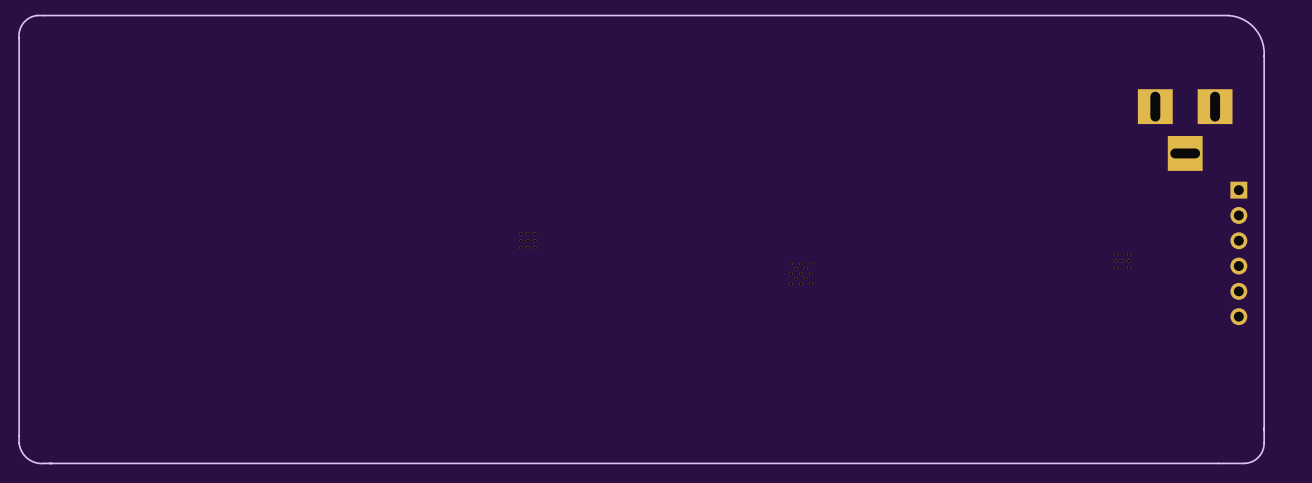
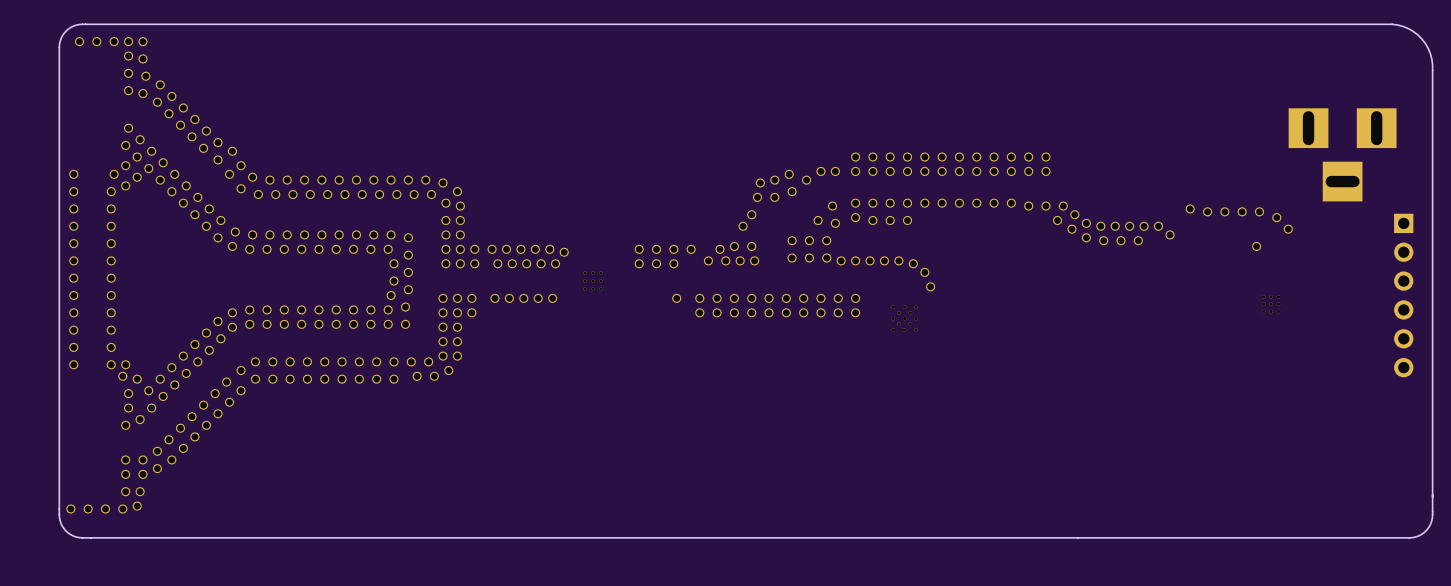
board edge: (79, 15) (34, 16) (25, 21) (19, 32) (19, 443) (23, 454) (35, 462) (1243, 463) (1251, 461) (1258, 457) (1262, 450) (1264, 443) -> (82, 24) (73, 26) (66, 31) (61, 38) (59, 47) (59, 514) (64, 528) (73, 536) (82, 537) (1409, 537) (1418, 536) (1425, 531) (1430, 523) (1432, 511)
part: none -> (79, 41)
part: none -> (96, 41)
part: none -> (114, 41)
part: none -> (128, 41)
part: none -> (142, 41)
part: none -> (128, 56)
part: none -> (142, 58)
part: none -> (128, 73)
part: none -> (145, 76)
part: none -> (160, 84)
part: none -> (128, 90)
part: none -> (142, 93)
part: none -> (171, 96)
part: none -> (157, 102)
part: none -> (183, 107)
part: none -> (168, 113)
part: none -> (194, 119)
part: none -> (180, 125)
part: none -> (128, 128)
part: none -> (206, 131)
part: none -> (192, 136)
part: none -> (140, 139)
part: none -> (218, 142)
part: none -> (125, 145)
part: none -> (203, 148)
part: none -> (151, 151)
part: none -> (232, 151)
part: none -> (137, 157)
part: none -> (855, 157)
part: none -> (872, 157)
part: none -> (890, 157)
part: none -> (907, 157)
part: none -> (924, 157)
part: none -> (942, 157)
part: none -> (959, 157)
part: none -> (976, 157)
part: none -> (994, 157)
part: none -> (1011, 157)
part: none -> (1028, 157)
part: none -> (1046, 157)
part: none -> (218, 159)
part: none -> (163, 162)
part: none -> (125, 165)
part: none -> (241, 165)
part: none -> (148, 168)
part: none -> (820, 171)
part: none -> (835, 171)
part: none -> (855, 171)
part: none -> (872, 171)
part: none -> (890, 171)
part: none -> (907, 171)
part: none -> (924, 171)
part: none -> (942, 171)
part: none -> (959, 171)
part: none -> (976, 171)
part: none -> (994, 171)
part: none -> (1011, 171)
part: none -> (1028, 171)
part: none -> (1046, 171)
part: none -> (73, 174)
part: none -> (114, 174)
part: none -> (174, 174)
part: none -> (229, 174)
part: none -> (789, 174)
part: none -> (137, 177)
part: none -> (252, 177)
part: none -> (160, 180)
part: none -> (269, 180)
part: none -> (287, 180)
part: none -> (304, 180)
part: none -> (321, 180)
part: none -> (339, 180)
part: none -> (356, 180)
part: none -> (373, 180)
part: none -> (391, 180)
part: none -> (408, 180)
part: none -> (425, 180)
part: none -> (774, 180)
part: none -> (806, 180)
part: none -> (443, 182)
part: none -> (760, 182)
part: none -> (125, 185)
part: none -> (186, 185)
part: none -> (241, 188)
part: none -> (73, 191)
part: none -> (111, 191)
part: none -> (171, 191)
part: none -> (457, 191)
part: none -> (792, 191)
part: none -> (258, 194)
part: none -> (275, 194)
part: none -> (293, 194)
part: none -> (310, 194)
part: none -> (327, 194)
part: none -> (344, 194)
part: none -> (362, 194)
part: none -> (379, 194)
part: none -> (396, 194)
part: none -> (414, 194)
part: none -> (431, 194)
part: none -> (197, 197)
part: none -> (757, 197)
part: none -> (774, 197)
part: none -> (183, 203)
part: none -> (445, 203)
part: none -> (855, 203)
part: none -> (872, 203)
part: none -> (890, 203)
part: none -> (907, 203)
part: none -> (924, 203)
part: none -> (942, 203)
part: none -> (959, 203)
part: none -> (976, 203)
part: none -> (994, 203)
part: none -> (1011, 203)
part: none -> (460, 206)
part: none -> (832, 206)
part: none -> (1028, 206)
part: none -> (1046, 206)
part: none -> (1063, 206)
part: none -> (73, 208)
part: none -> (111, 208)
part: none -> (209, 208)
part: none -> (1190, 208)
part: none -> (1207, 211)
part: none -> (1224, 211)
part: none -> (1242, 211)
part: none -> (1259, 211)
part: none -> (194, 214)
part: none -> (751, 214)
part: none -> (1074, 214)
part: none -> (855, 217)
part: none -> (1276, 217)
part: none -> (220, 220)
part: none -> (445, 220)
part: none -> (460, 220)
part: none -> (818, 220)
part: none -> (872, 220)
part: none -> (890, 220)
part: none -> (907, 220)
part: none -> (1057, 220)
part: none -> (835, 223)
part: none -> (1086, 223)
part: none -> (73, 226)
part: none -> (111, 226)
part: none -> (206, 226)
part: none -> (743, 226)
part: none -> (1100, 226)
part: none -> (1115, 226)
part: none -> (1129, 226)
part: none -> (1144, 226)
part: none -> (1158, 226)
part: none -> (1071, 229)
part: none -> (1288, 229)
part: none -> (235, 232)
part: none -> (252, 234)
part: none -> (269, 234)
part: none -> (287, 234)
part: none -> (304, 234)
part: none -> (321, 234)
part: none -> (339, 234)
part: none -> (356, 234)
part: none -> (373, 234)
part: none -> (391, 234)
part: none -> (445, 234)
part: none -> (460, 234)
part: none -> (1170, 234)
part: none -> (218, 237)
part: none -> (408, 237)
part: none -> (1086, 237)
part: none -> (792, 240)
part: none -> (809, 240)
part: none -> (826, 240)
part: none -> (1103, 240)
part: none -> (1121, 240)
part: none -> (1138, 240)
part: none -> (73, 243)
part: none -> (111, 243)
part: none -> (232, 246)
part: none -> (734, 246)
part: none -> (751, 246)
part: none -> (1256, 246)
part: none -> (249, 249)
part: none -> (267, 249)
part: none -> (284, 249)
part: none -> (301, 249)
part: none -> (318, 249)
part: none -> (336, 249)
part: none -> (353, 249)
part: none -> (370, 249)
part: none -> (388, 249)
part: none -> (445, 249)
part: none -> (460, 249)
part: none -> (474, 249)
part: none -> (492, 249)
part: none -> (506, 249)
part: none -> (520, 249)
part: none -> (535, 249)
part: none -> (549, 249)
part: none -> (639, 249)
part: none -> (656, 249)
part: none -> (673, 249)
part: none -> (691, 249)
part: none -> (719, 249)
part: none -> (564, 252)
part: none -> (408, 255)
part: none -> (792, 258)
part: none -> (809, 258)
part: none -> (826, 258)
part: none -> (73, 260)
part: none -> (111, 260)
part: none -> (708, 260)
part: none -> (725, 260)
part: none -> (740, 260)
part: none -> (754, 260)
part: none -> (841, 260)
part: none -> (855, 260)
part: none -> (870, 260)
part: none -> (884, 260)
part: none -> (898, 260)
part: none -> (393, 263)
part: none -> (445, 263)
part: none -> (460, 263)
part: none -> (474, 263)
part: none -> (497, 263)
part: none -> (512, 263)
part: none -> (526, 263)
part: none -> (541, 263)
part: none -> (555, 263)
part: none -> (639, 263)
part: none -> (656, 263)
part: none -> (673, 263)
part: none -> (913, 263)
part: none -> (408, 272)
part: none -> (924, 272)
part: none -> (73, 278)
part: none -> (111, 278)
part: none -> (393, 281)
part: none -> (930, 286)
part: none -> (408, 289)
part: none -> (73, 295)
part: none -> (111, 295)
part: none -> (391, 295)
part: none -> (443, 298)
part: none -> (457, 298)
part: none -> (471, 298)
part: none -> (494, 298)
part: none -> (509, 298)
part: none -> (523, 298)
part: none -> (538, 298)
part: none -> (552, 298)
part: none -> (676, 298)
part: none -> (699, 298)
part: none -> (717, 298)
part: none -> (734, 298)
part: none -> (751, 298)
part: none -> (769, 298)
part: none -> (786, 298)
part: none -> (803, 298)
part: none -> (820, 298)
part: none -> (838, 298)
part: none -> (855, 298)
part: none -> (405, 307)
part: none -> (249, 309)
part: none -> (267, 309)
part: none -> (284, 309)
part: none -> (301, 309)
part: none -> (318, 309)
part: none -> (336, 309)
part: none -> (353, 309)
part: none -> (370, 309)
part: none -> (388, 309)
part: none -> (73, 312)
part: none -> (111, 312)
part: none -> (232, 312)
part: none -> (443, 312)
part: none -> (457, 312)
part: none -> (471, 312)
part: none -> (699, 312)
part: none -> (717, 312)
part: none -> (734, 312)
part: none -> (751, 312)
part: none -> (769, 312)
part: none -> (786, 312)
part: none -> (803, 312)
part: none -> (820, 312)
part: none -> (838, 312)
part: none -> (855, 312)
part: none -> (218, 321)
part: none -> (249, 324)
part: none -> (267, 324)
part: none -> (284, 324)
part: none -> (301, 324)
part: none -> (318, 324)
part: none -> (336, 324)
part: none -> (353, 324)
part: none -> (370, 324)
part: none -> (388, 324)
part: none -> (405, 324)
part: none -> (232, 327)
part: none -> (443, 327)
part: none -> (457, 327)
part: none -> (73, 330)
part: none -> (111, 330)
part: none -> (206, 333)
part: none -> (220, 338)
part: none -> (443, 341)
part: none -> (457, 341)
part: none -> (194, 344)
part: none -> (73, 347)
part: none -> (111, 347)
part: none -> (209, 350)
part: none -> (183, 356)
part: none -> (443, 356)
part: none -> (457, 356)
part: none -> (197, 361)
part: none -> (255, 361)
part: none -> (272, 361)
part: none -> (290, 361)
part: none -> (307, 361)
part: none -> (324, 361)
part: none -> (342, 361)
part: none -> (359, 361)
part: none -> (376, 361)
part: none -> (393, 361)
part: none -> (411, 361)
part: none -> (428, 361)
part: none -> (73, 364)
part: none -> (111, 364)
part: none -> (125, 364)
part: none -> (171, 367)
part: none -> (241, 370)
part: none -> (448, 370)
part: none -> (186, 373)
part: none -> (122, 376)
part: none -> (417, 376)
part: none -> (434, 376)
part: none -> (137, 379)
part: none -> (160, 379)
part: none -> (255, 379)
part: none -> (272, 379)
part: none -> (290, 379)
part: none -> (307, 379)
part: none -> (324, 379)
part: none -> (342, 379)
part: none -> (359, 379)
part: none -> (376, 379)
part: none -> (393, 379)
part: none -> (226, 382)
part: none -> (174, 384)
part: none -> (148, 390)
part: none -> (241, 390)
part: none -> (128, 393)
part: none -> (215, 393)
part: none -> (163, 396)
part: none -> (229, 402)
part: none -> (203, 405)
part: none -> (128, 408)
part: none -> (151, 408)
part: none -> (218, 413)
part: none -> (192, 416)
part: none -> (140, 419)
part: none -> (125, 425)
part: none -> (206, 425)
part: none -> (180, 428)
part: none -> (194, 436)
part: none -> (168, 439)
part: none -> (183, 448)
part: none -> (157, 451)
part: none -> (125, 459)
part: none -> (142, 459)
part: none -> (171, 459)
part: none -> (157, 468)
part: none -> (125, 474)
part: none -> (142, 474)
part: none -> (125, 491)
part: none -> (140, 491)
part: none -> (137, 506)
part: none -> (70, 508)
part: none -> (88, 508)
part: none -> (105, 508)
part: none -> (122, 508)

